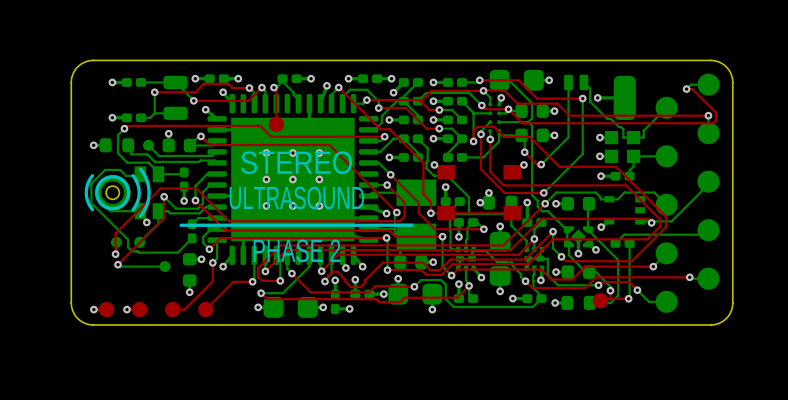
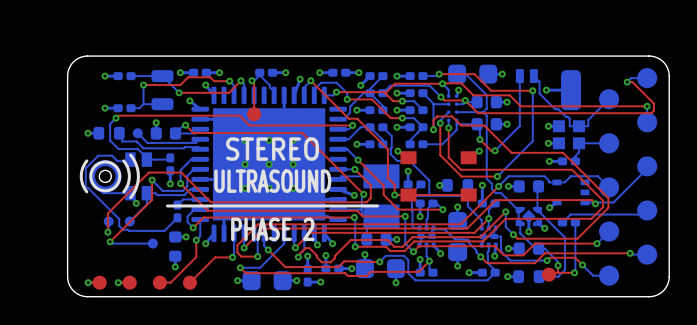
via: (488, 192) -> none

